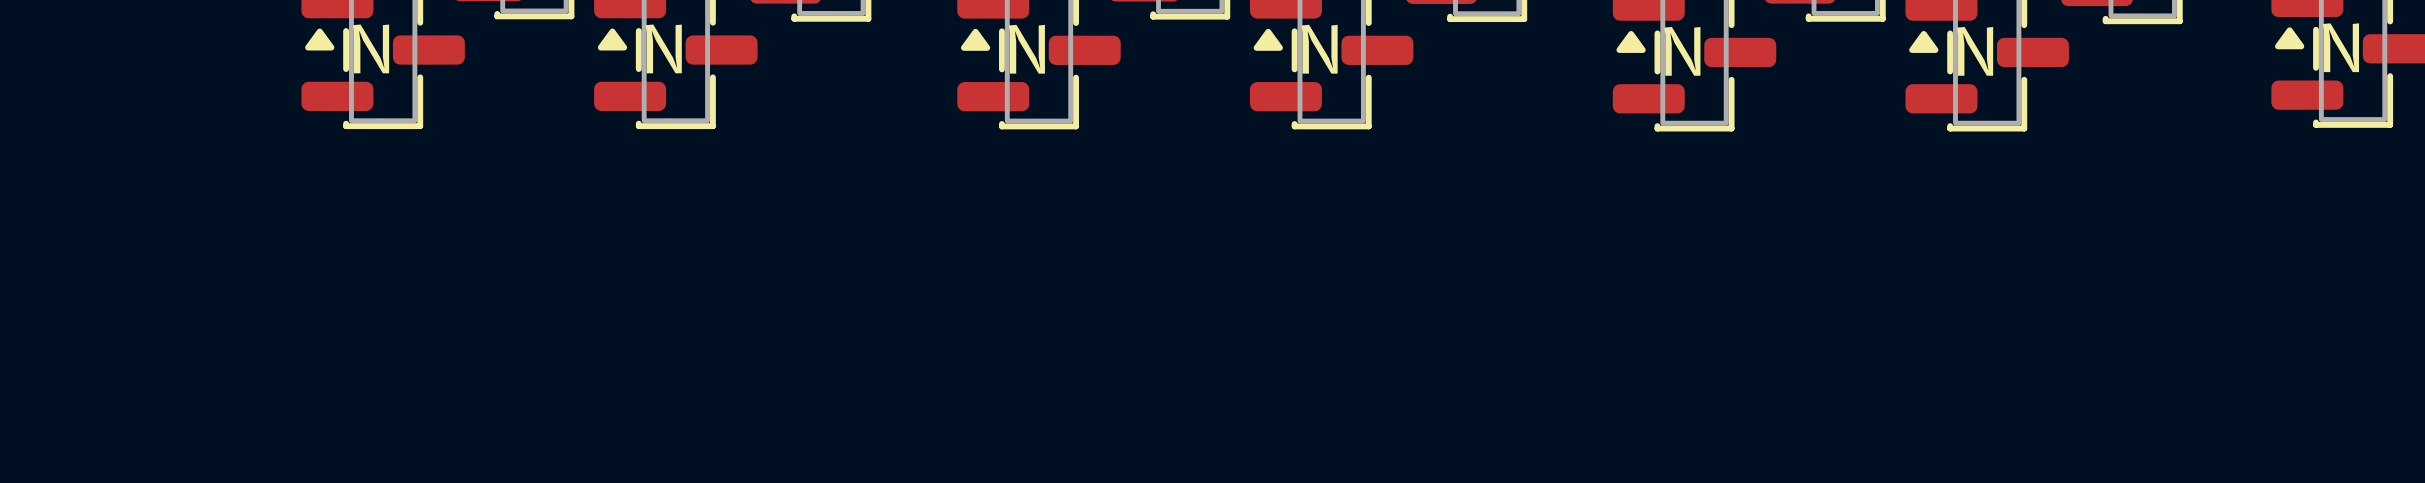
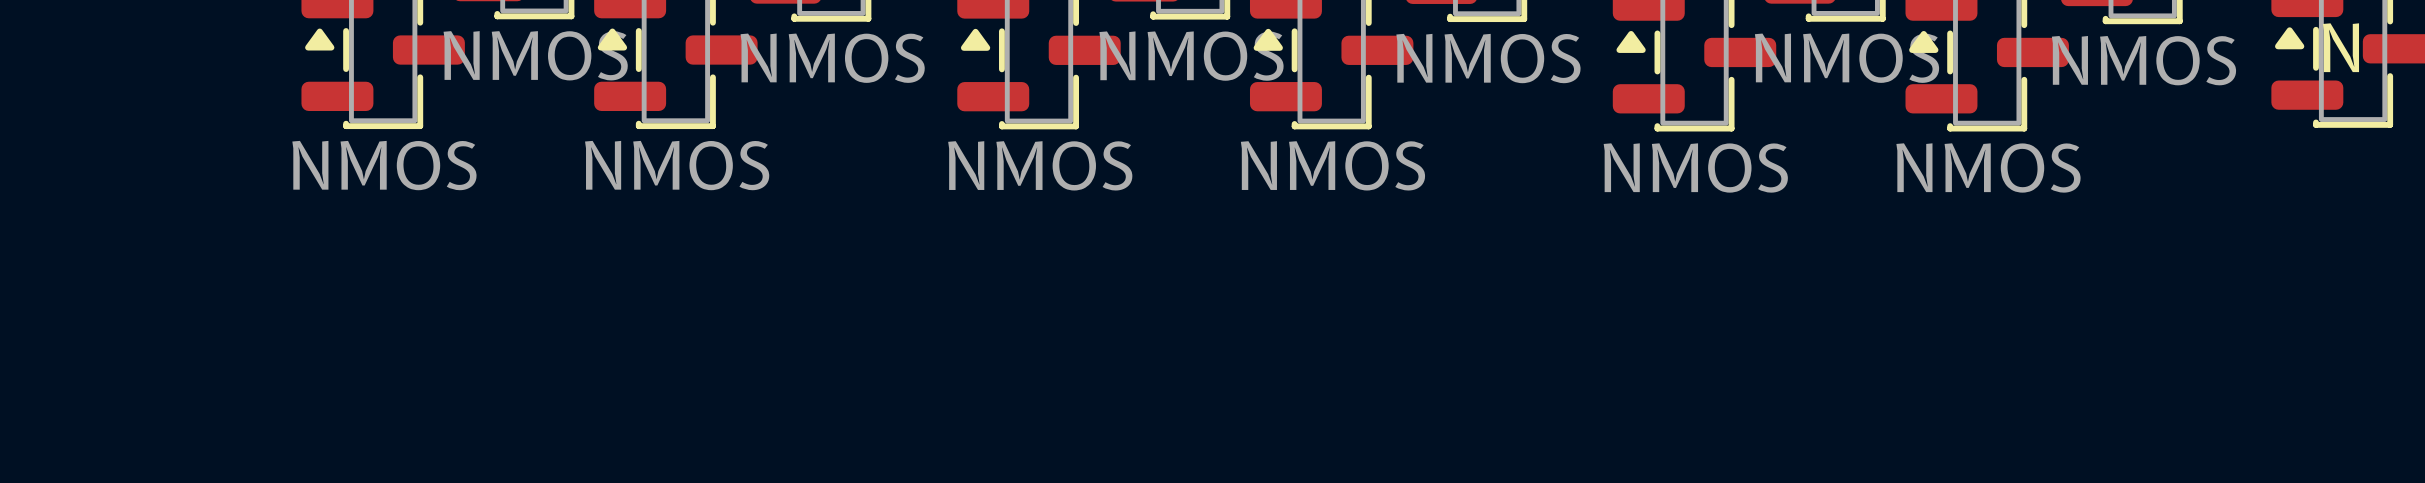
part text: N (371, 48) -> none
part text: N (663, 48) -> none
part text: N (1026, 49) -> none
part text: N (1319, 49) -> none
part text: N (1682, 51) -> none
part text: N (1975, 51) -> none
part value: none -> NMOS (535, 55)
part value: none -> NMOS (1191, 56)
part value: none -> NMOS (832, 58)
part value: none -> NMOS (1488, 58)
part value: none -> NMOS (1847, 58)
part value: none -> NMOS (2143, 60)
part value: none -> NMOS (384, 165)
part value: none -> NMOS (677, 165)
part value: none -> NMOS (1040, 165)
part value: none -> NMOS (1332, 165)
part value: none -> NMOS (1695, 167)
part value: none -> NMOS (1988, 167)

